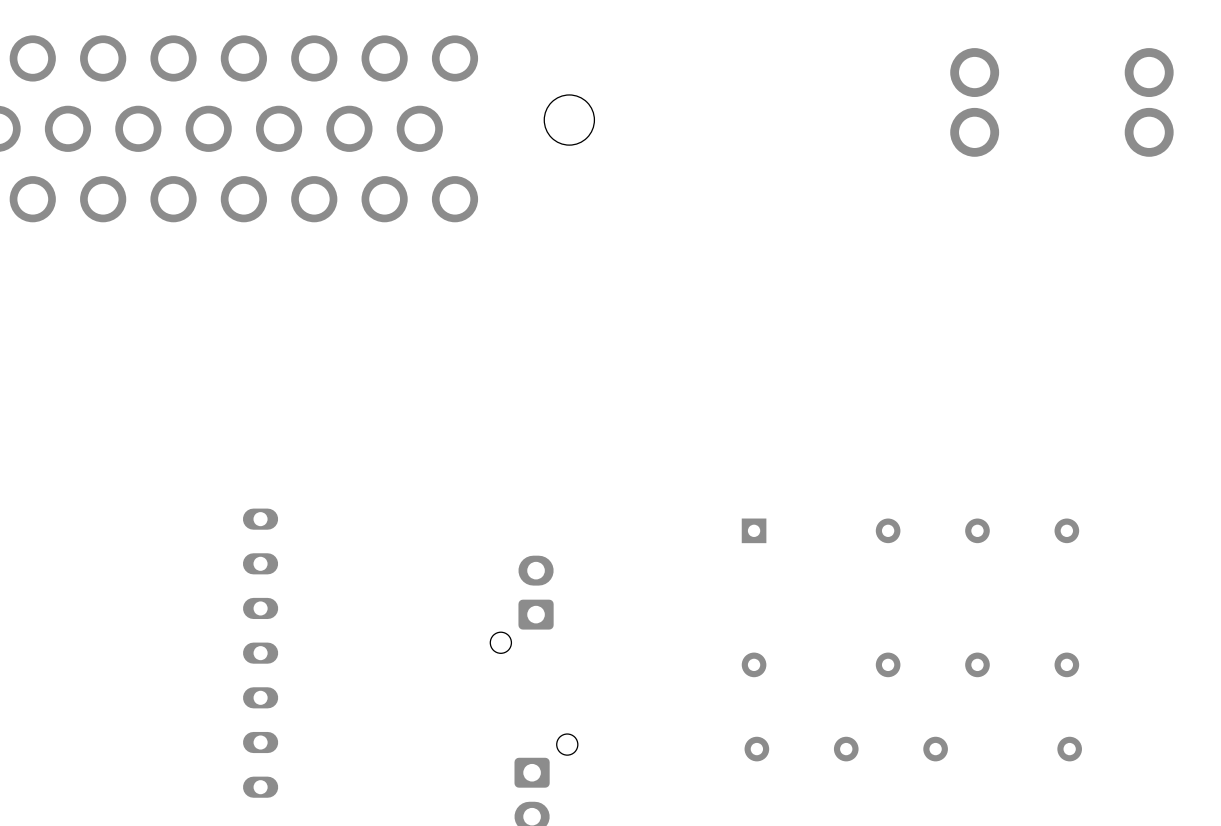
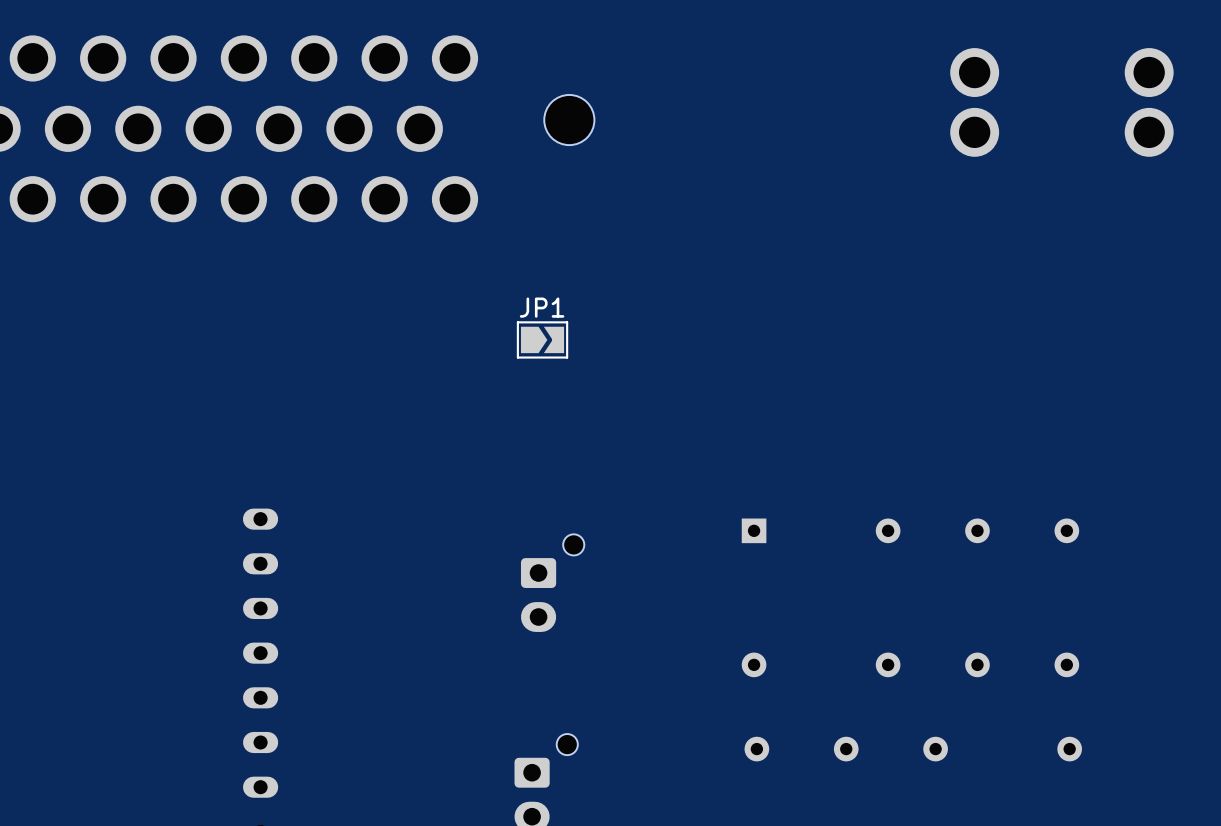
JP1: none -> (542, 339)
part rotation: 0° (521, 604) -> 180° (552, 583)

